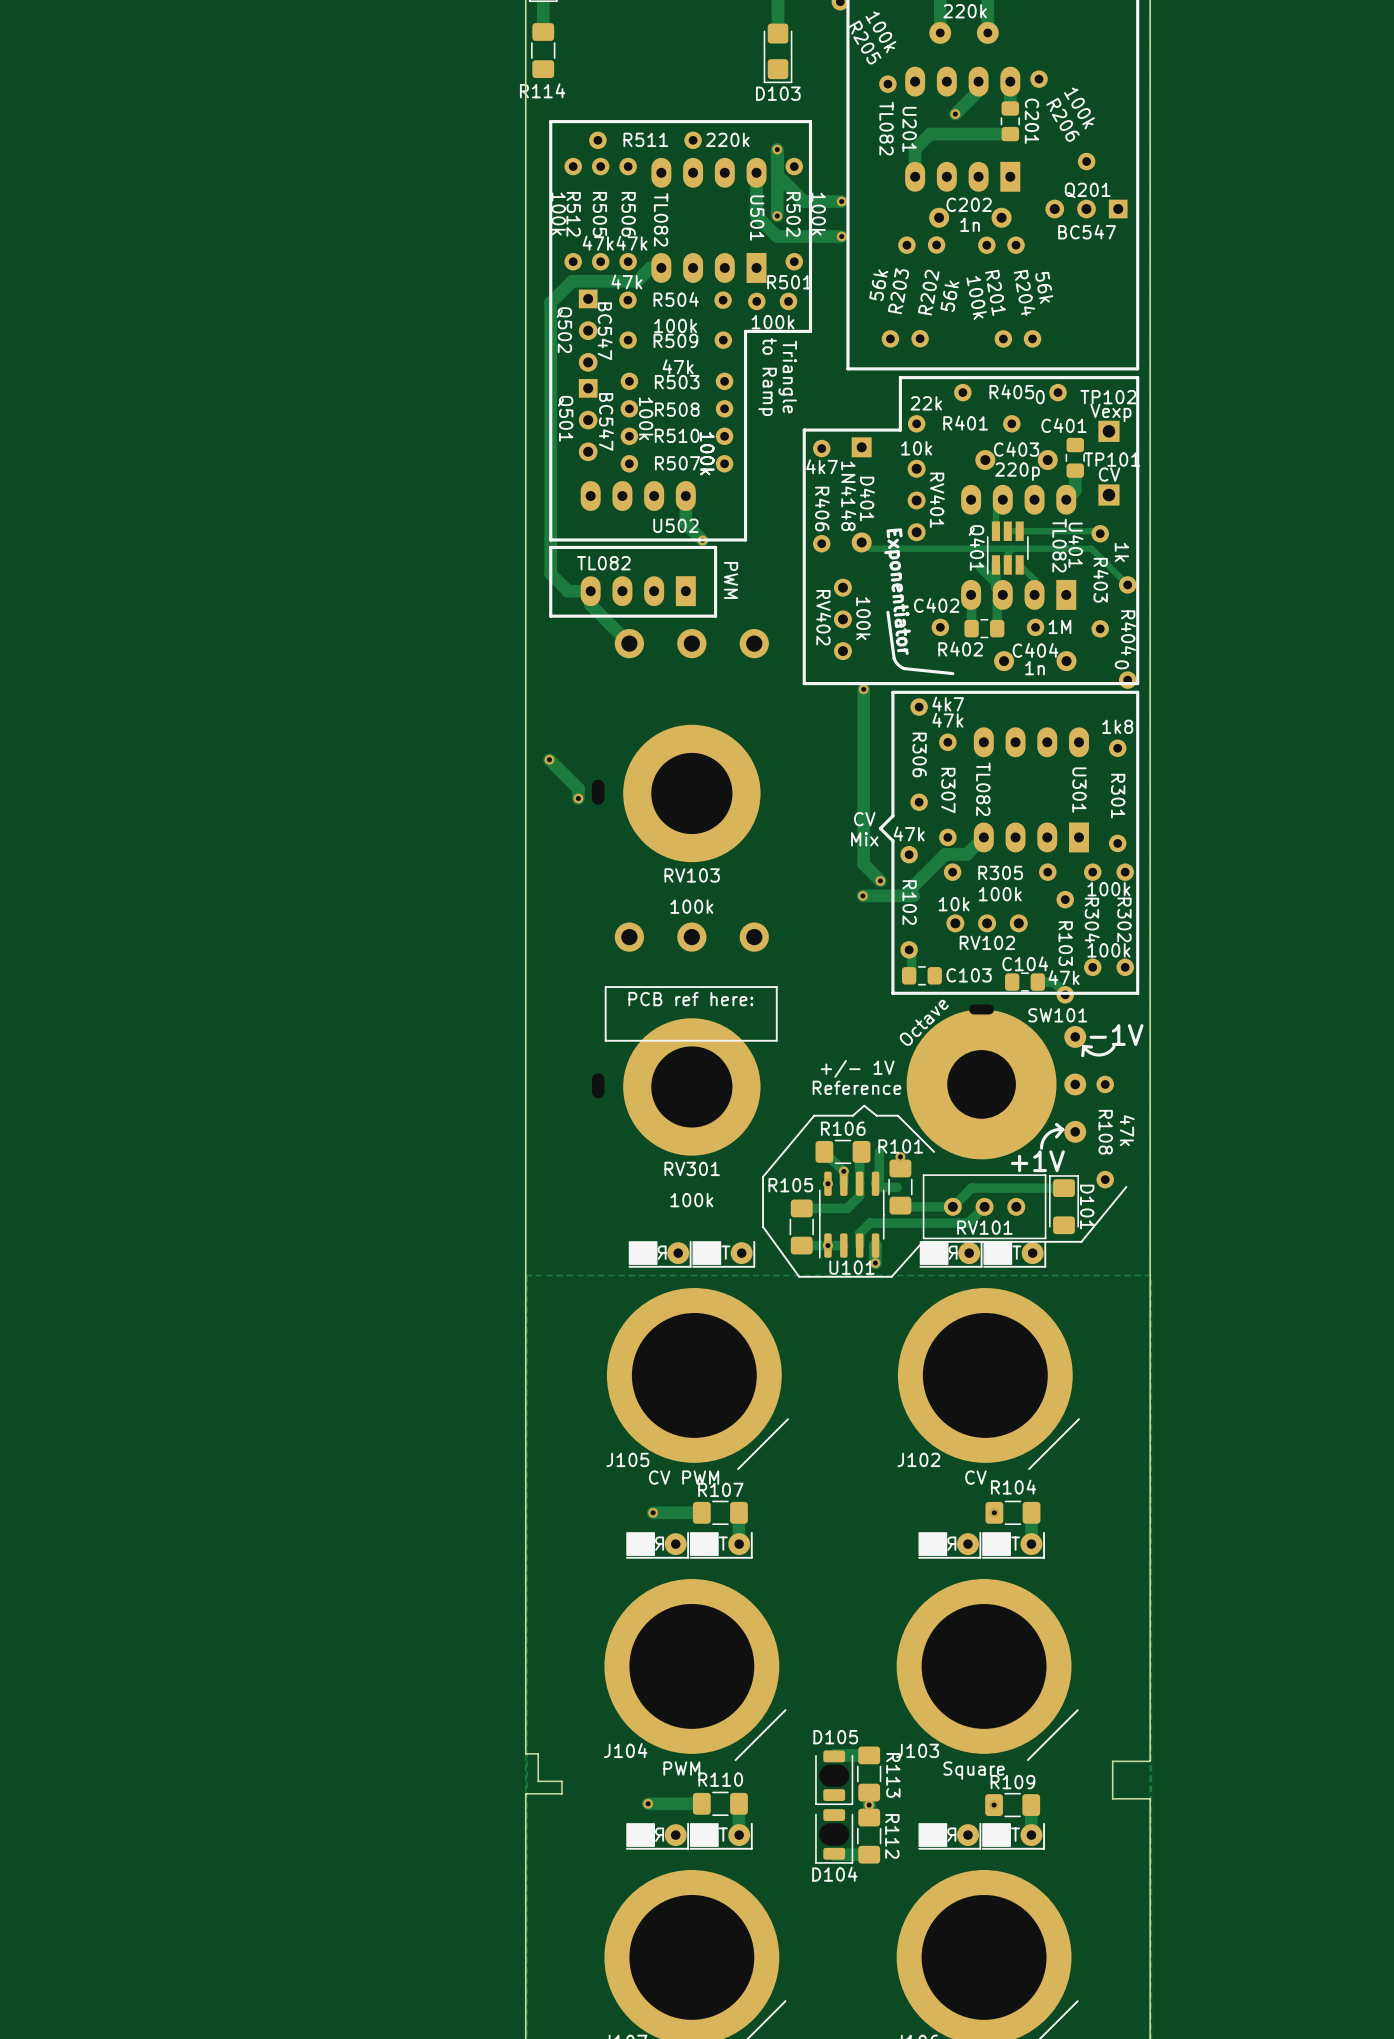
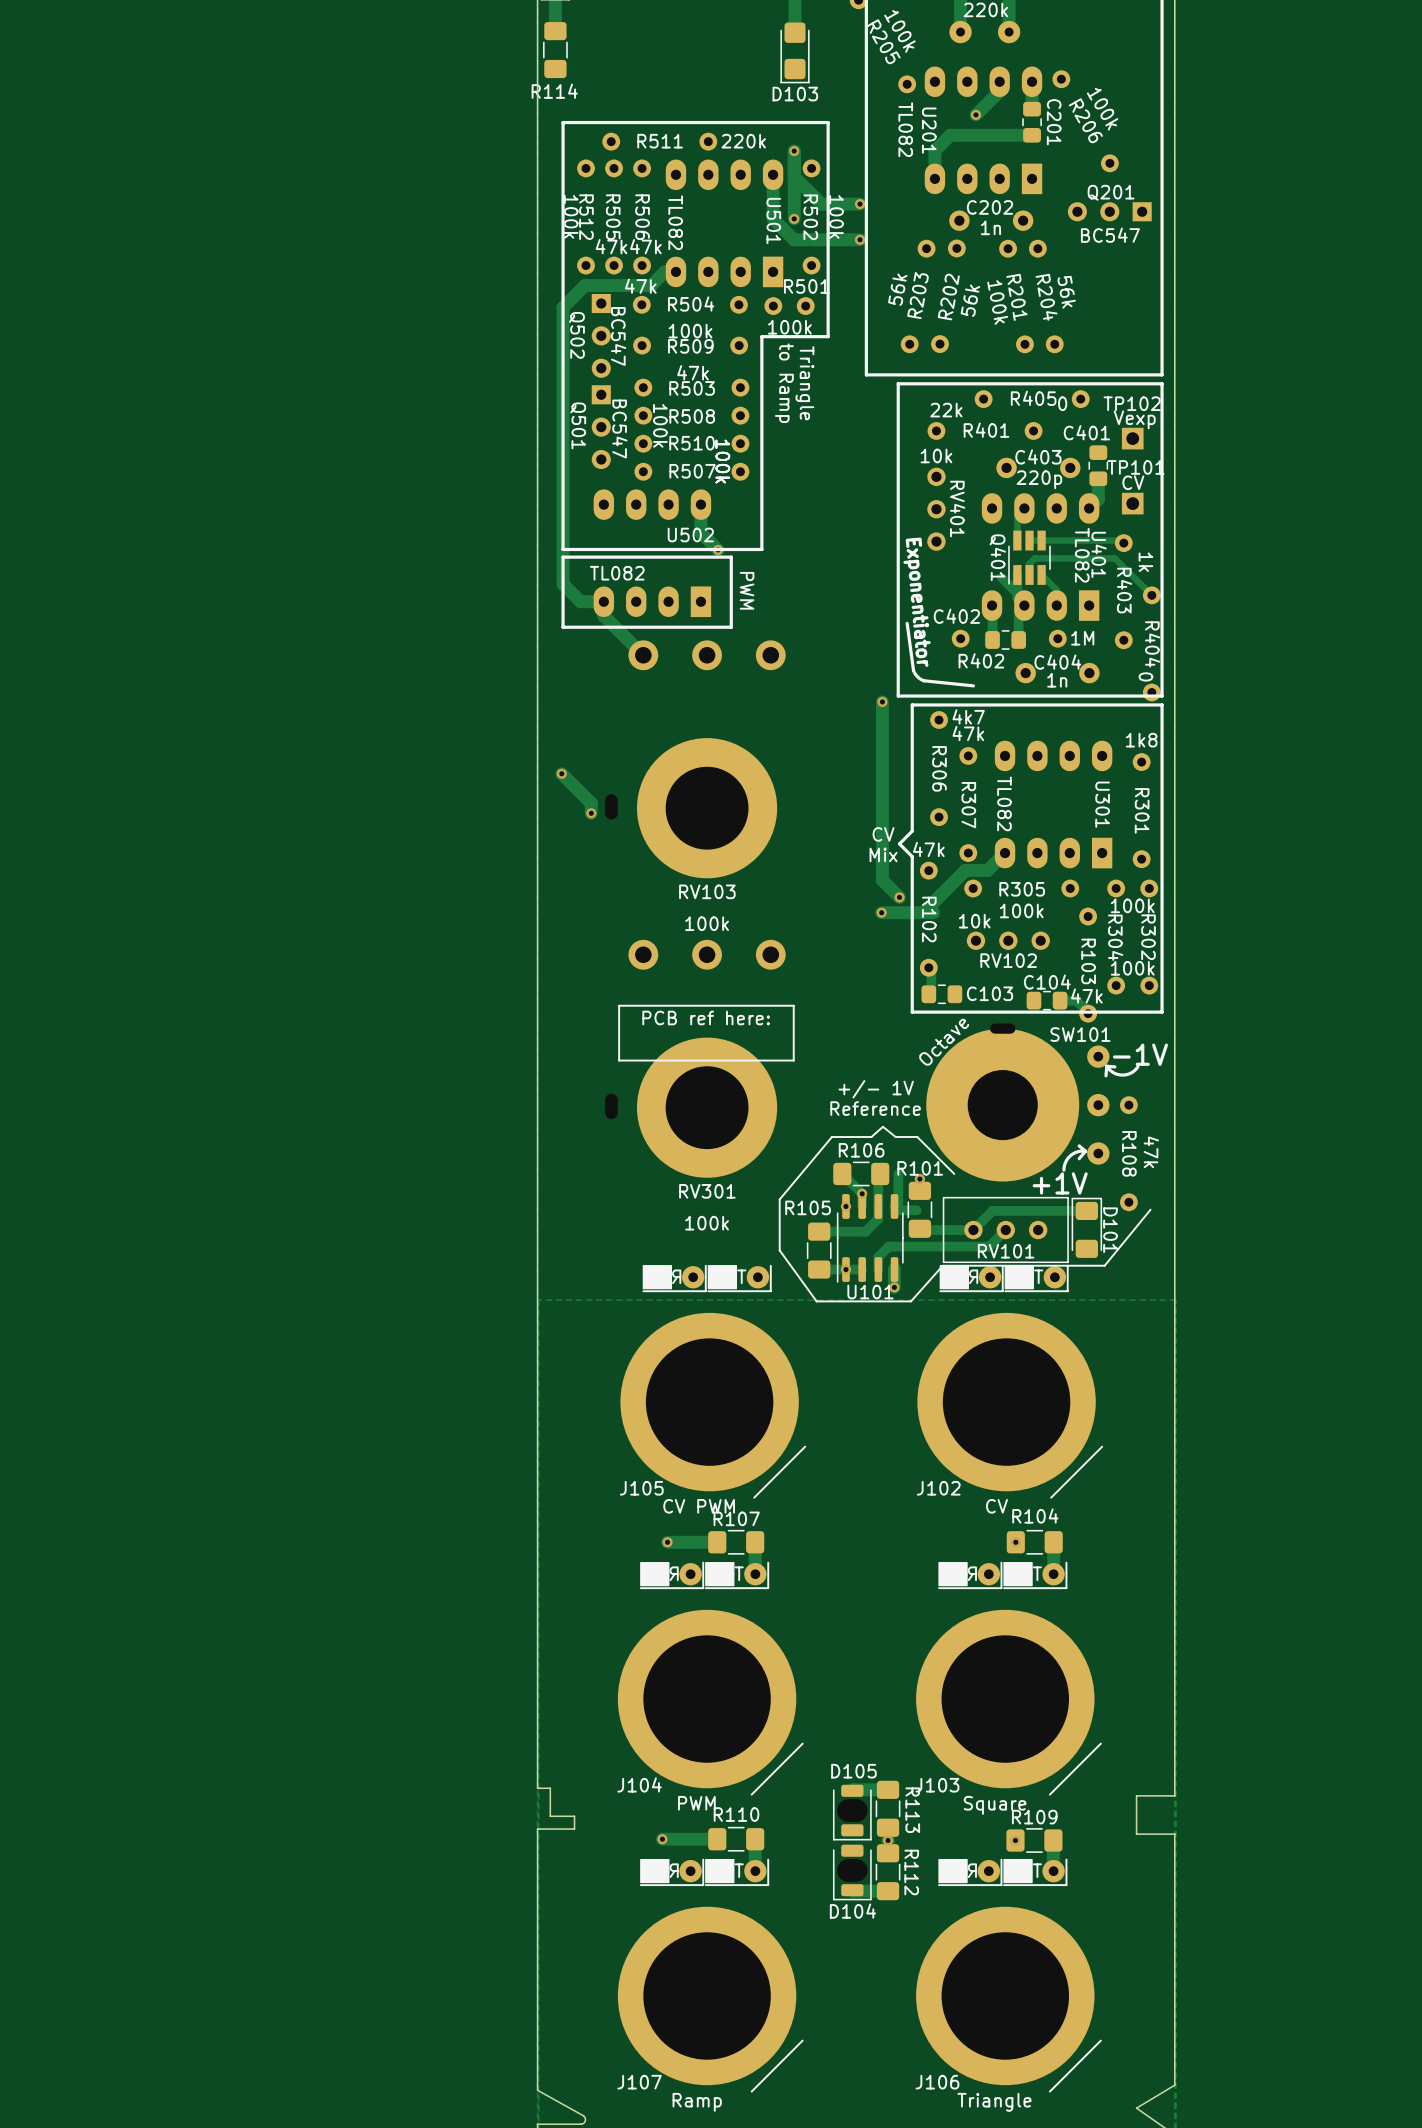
line: (900, 377) (900, 430) (804, 430) (804, 683) (879, 683) -> (919, 383) (898, 383) (898, 696)
D401: 1N4148 (861, 494) -> none
R406: 4k7 (821, 496) -> none
track: (861, 539) (870, 548) (1013, 548) -> none
RV402: 100k (842, 619) -> none

